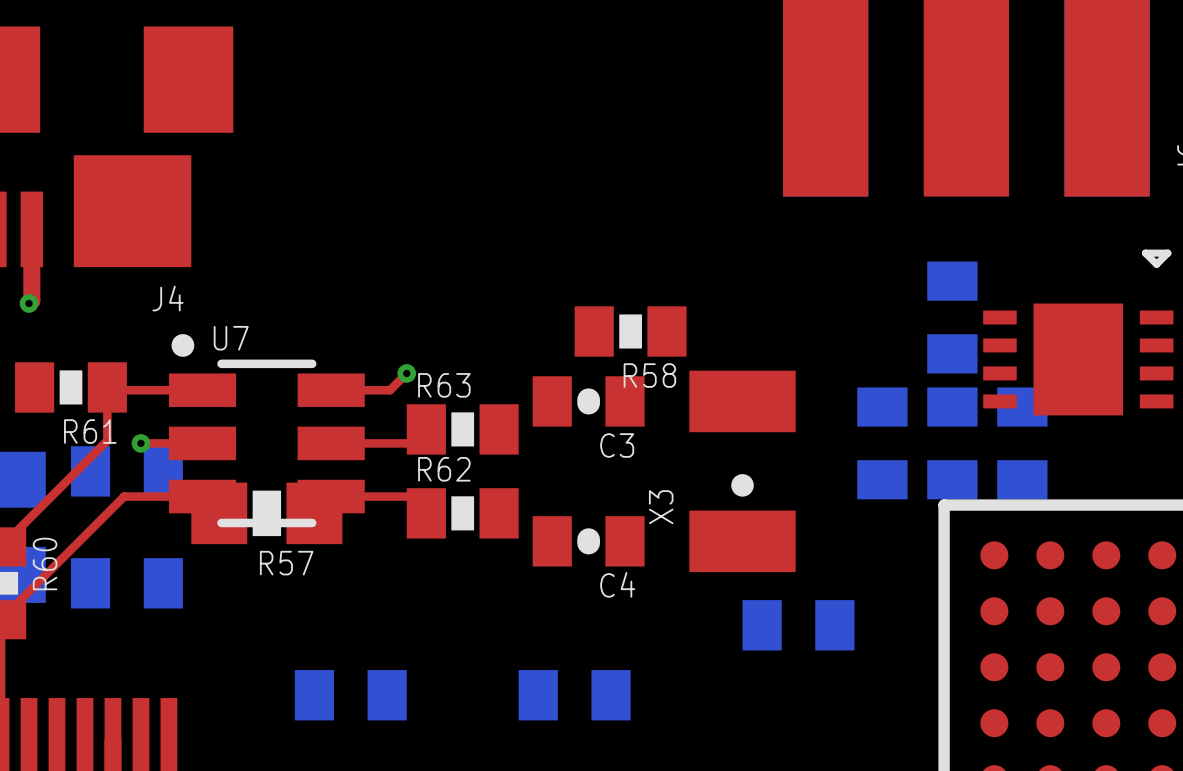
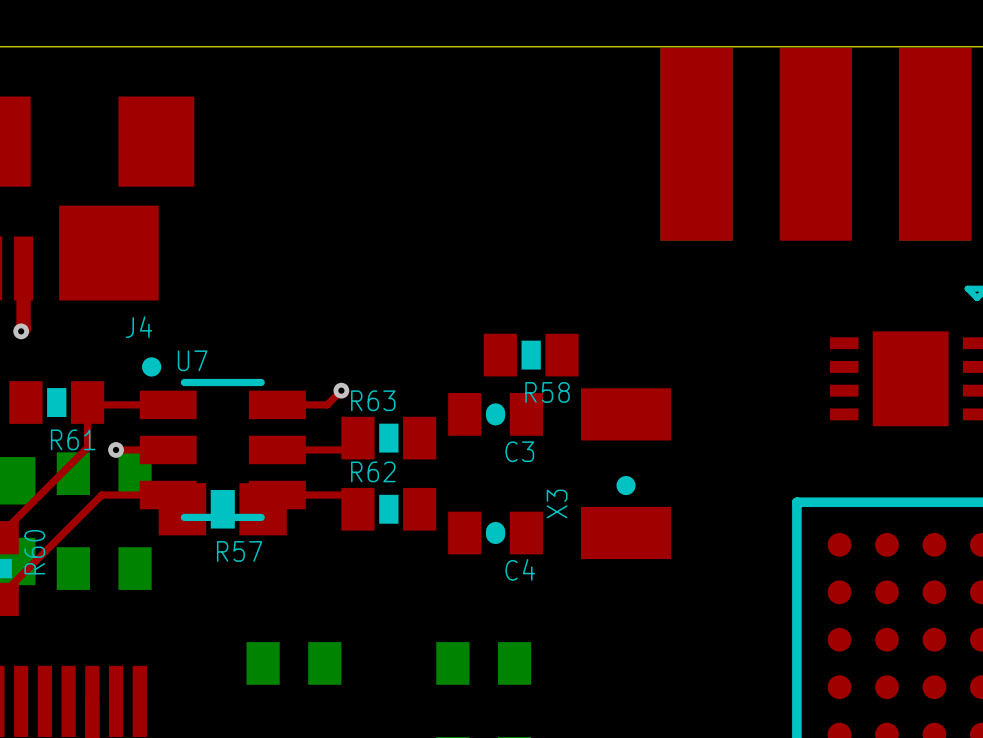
part: (952, 317) -> none
part: (882, 443) -> none
part: (952, 443) -> none
part: (1022, 443) -> none
part: (798, 625) -> none

